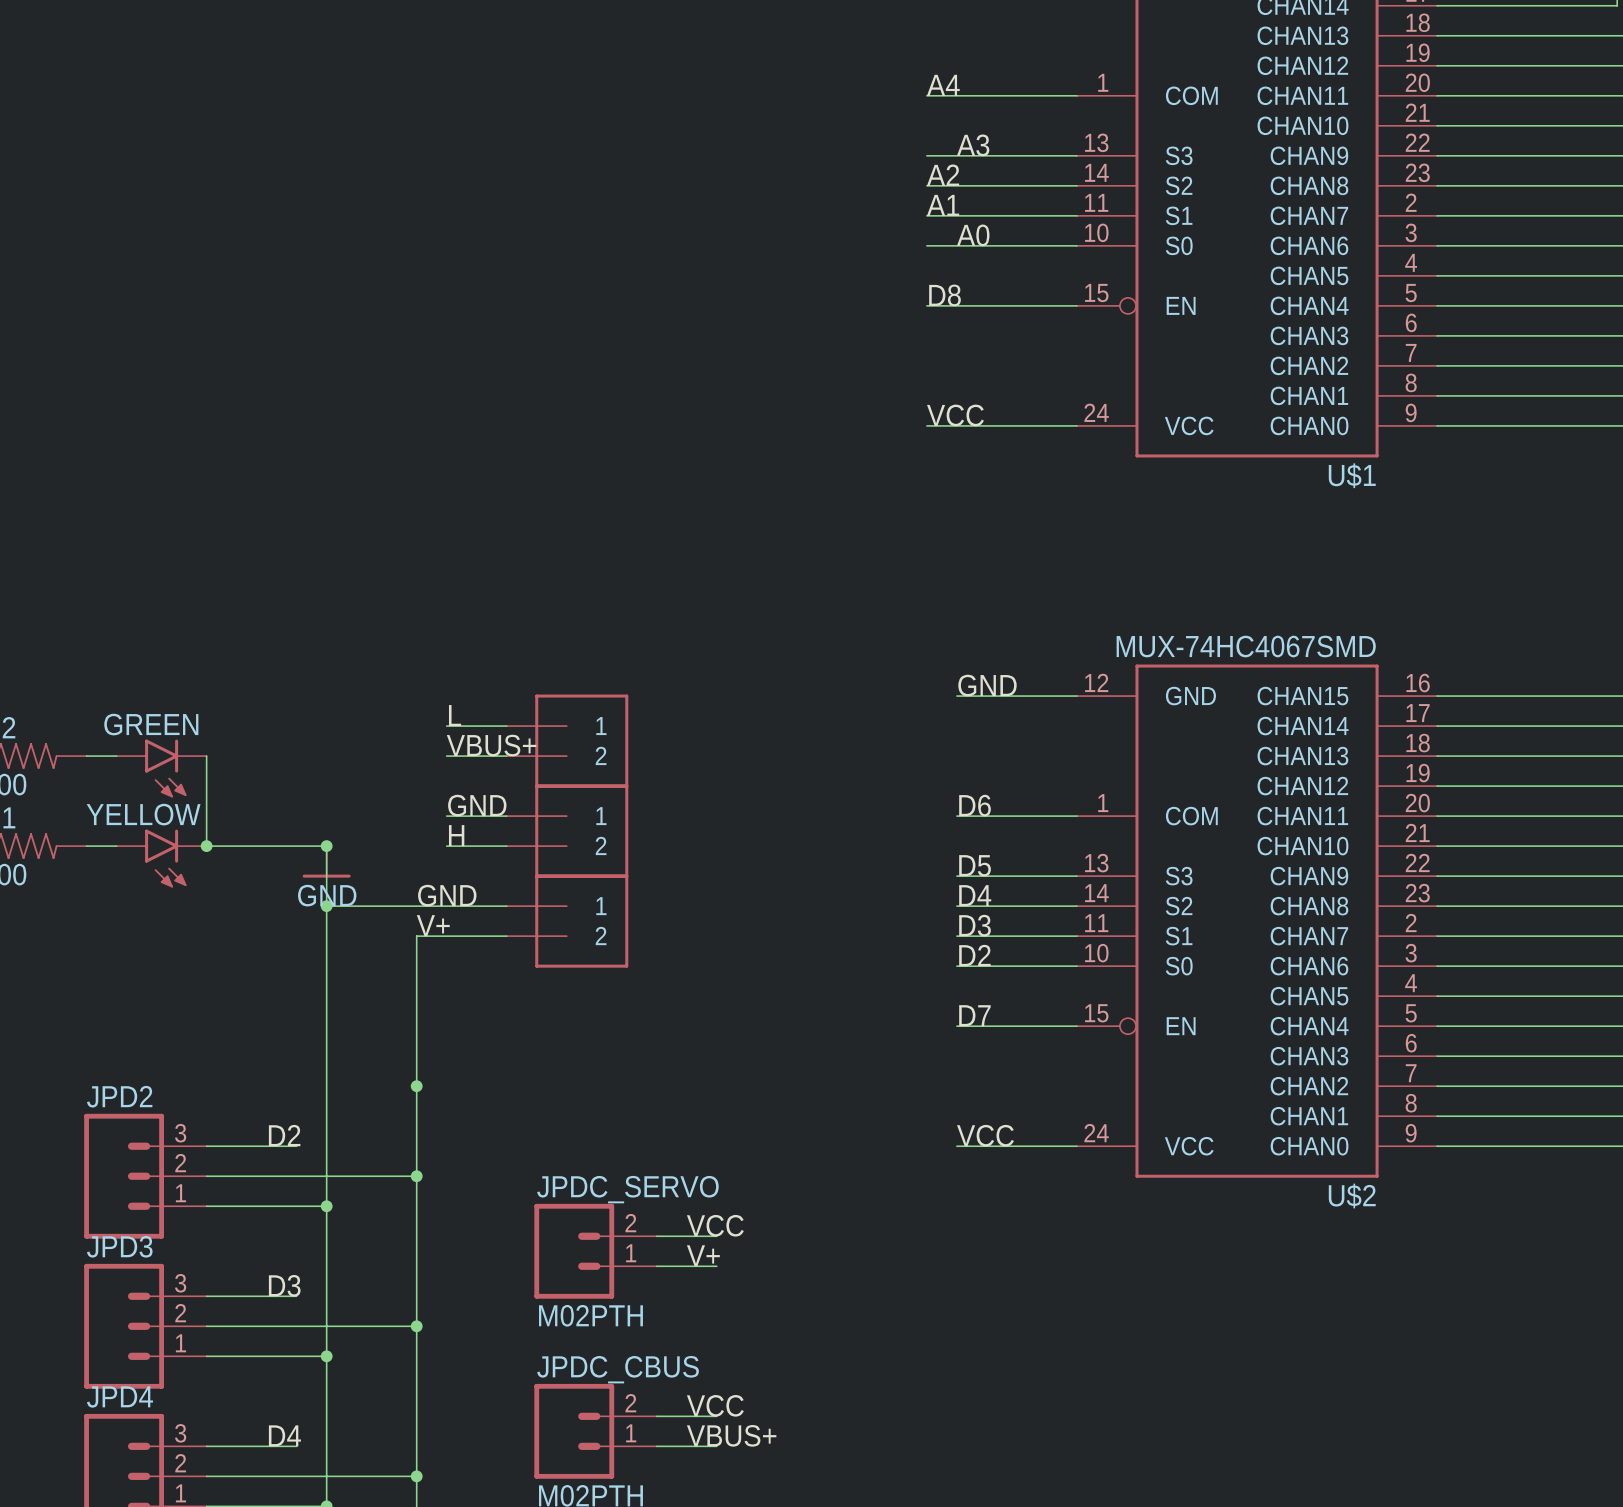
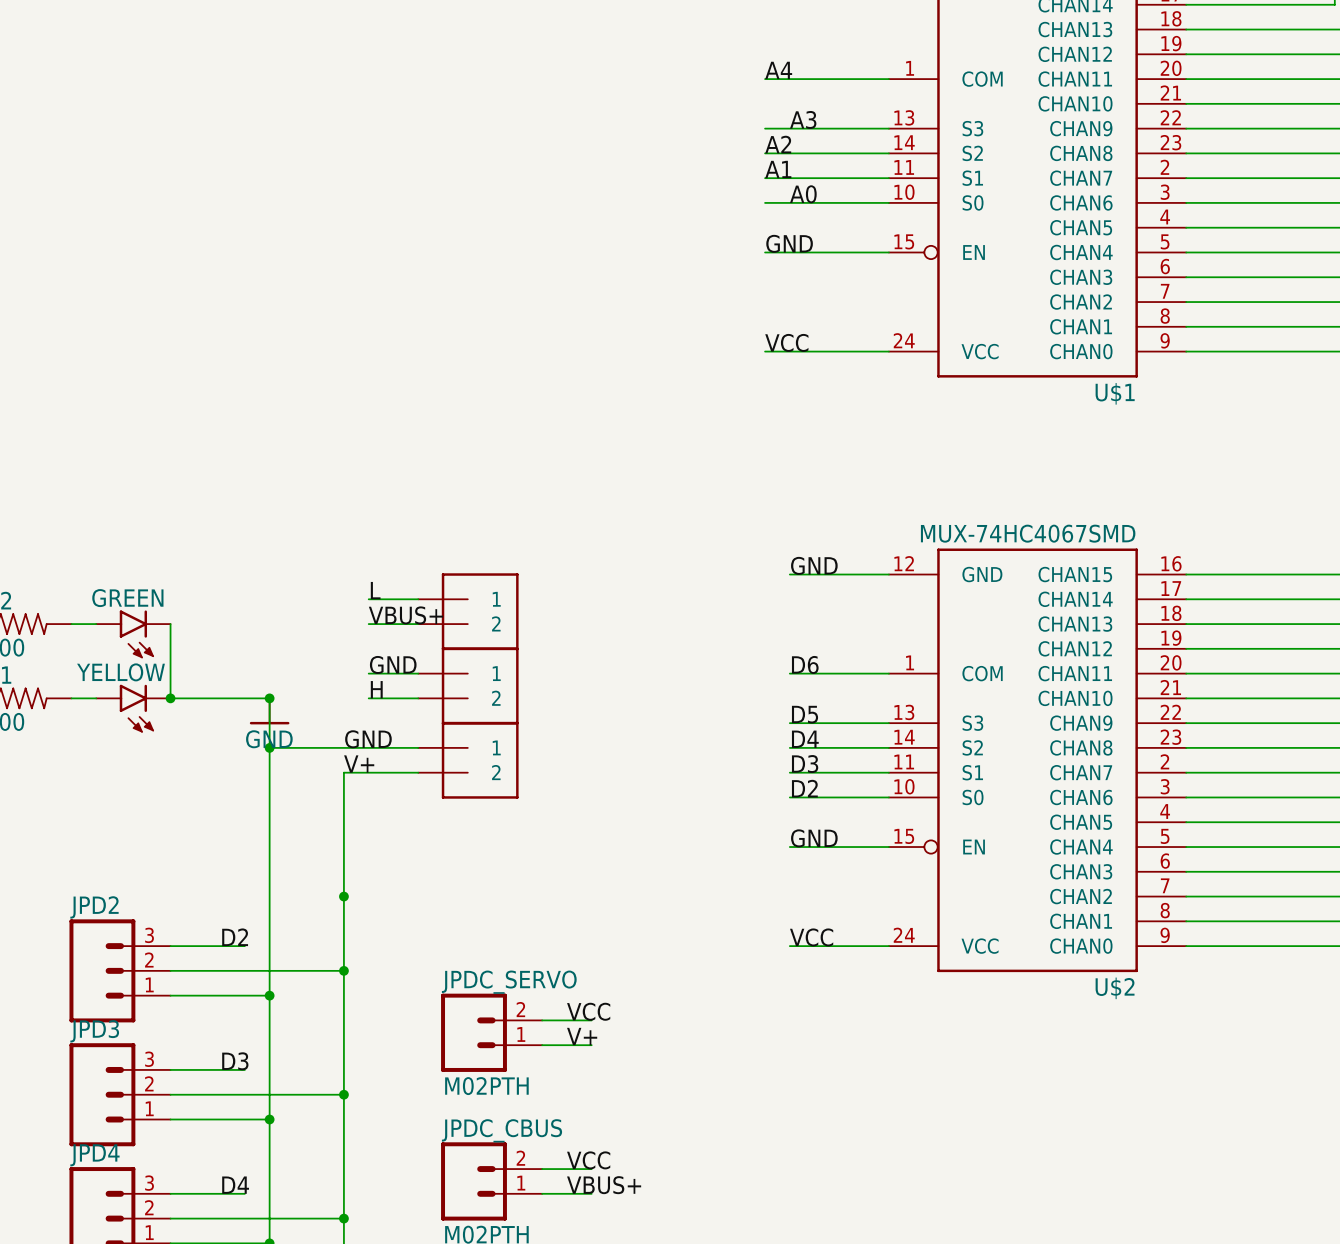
label: D8 (945, 295) -> GND (789, 243)
label: D7 (974, 1015) -> GND (814, 838)

